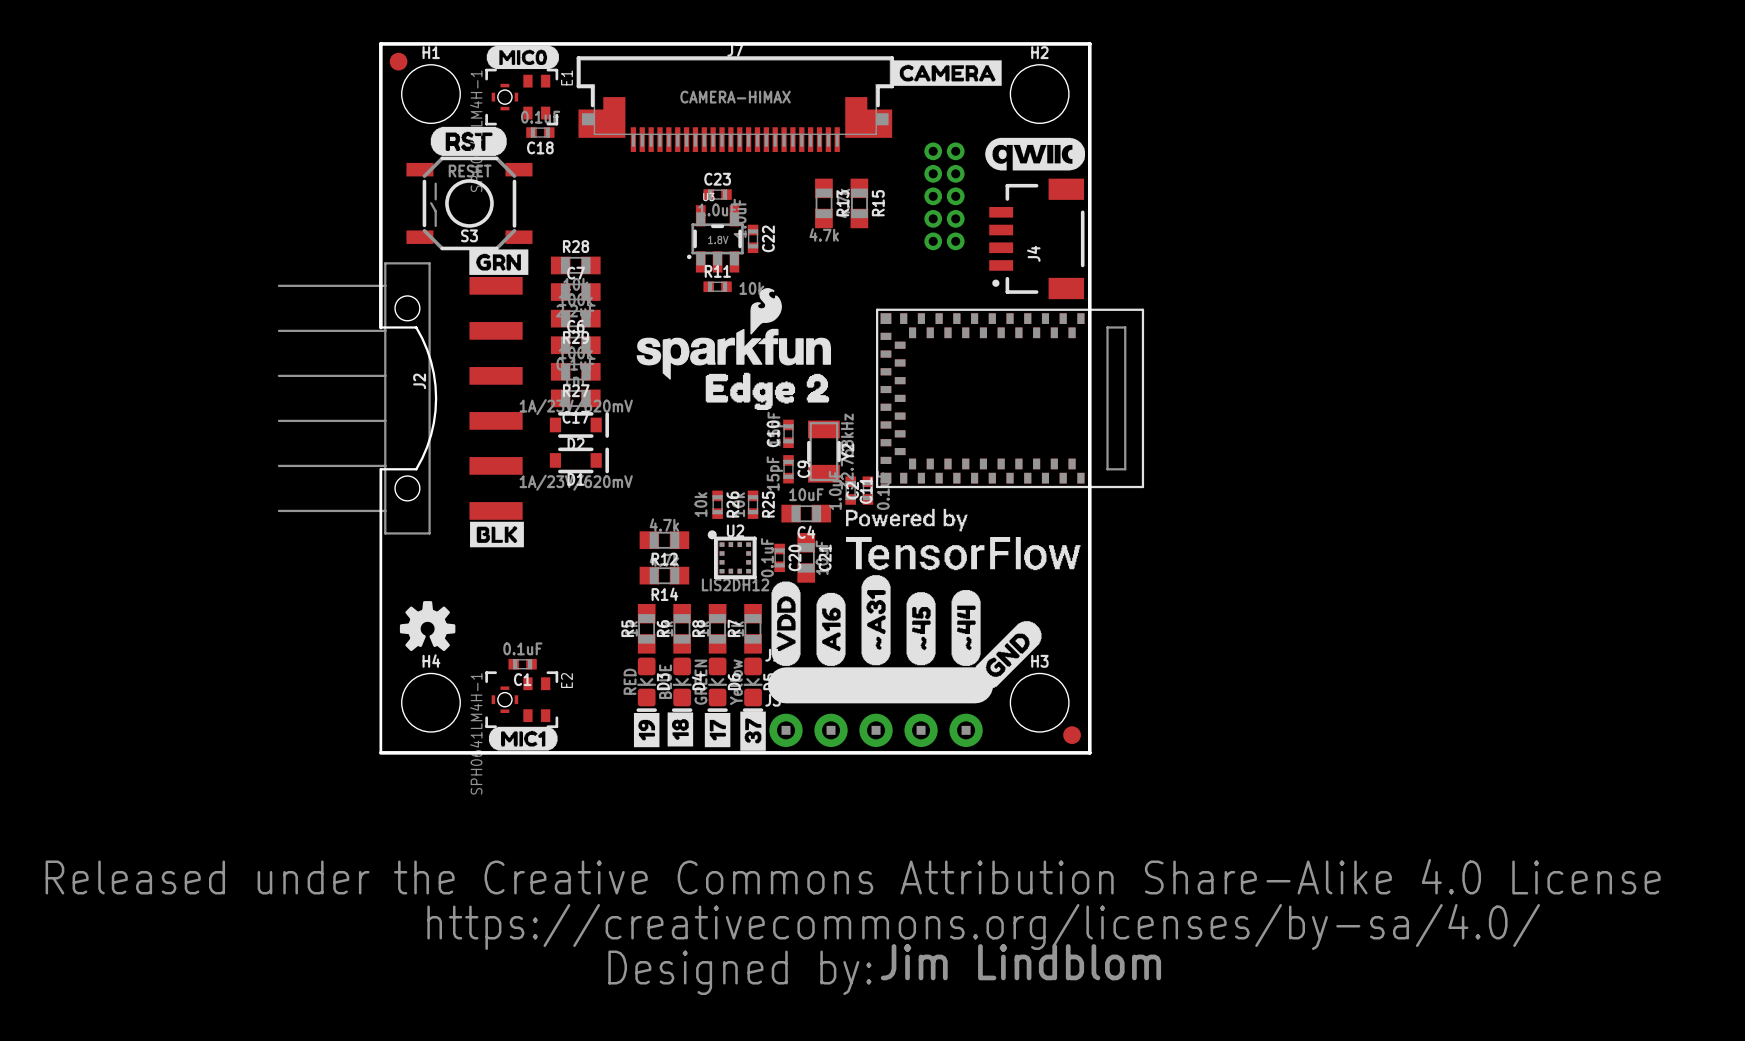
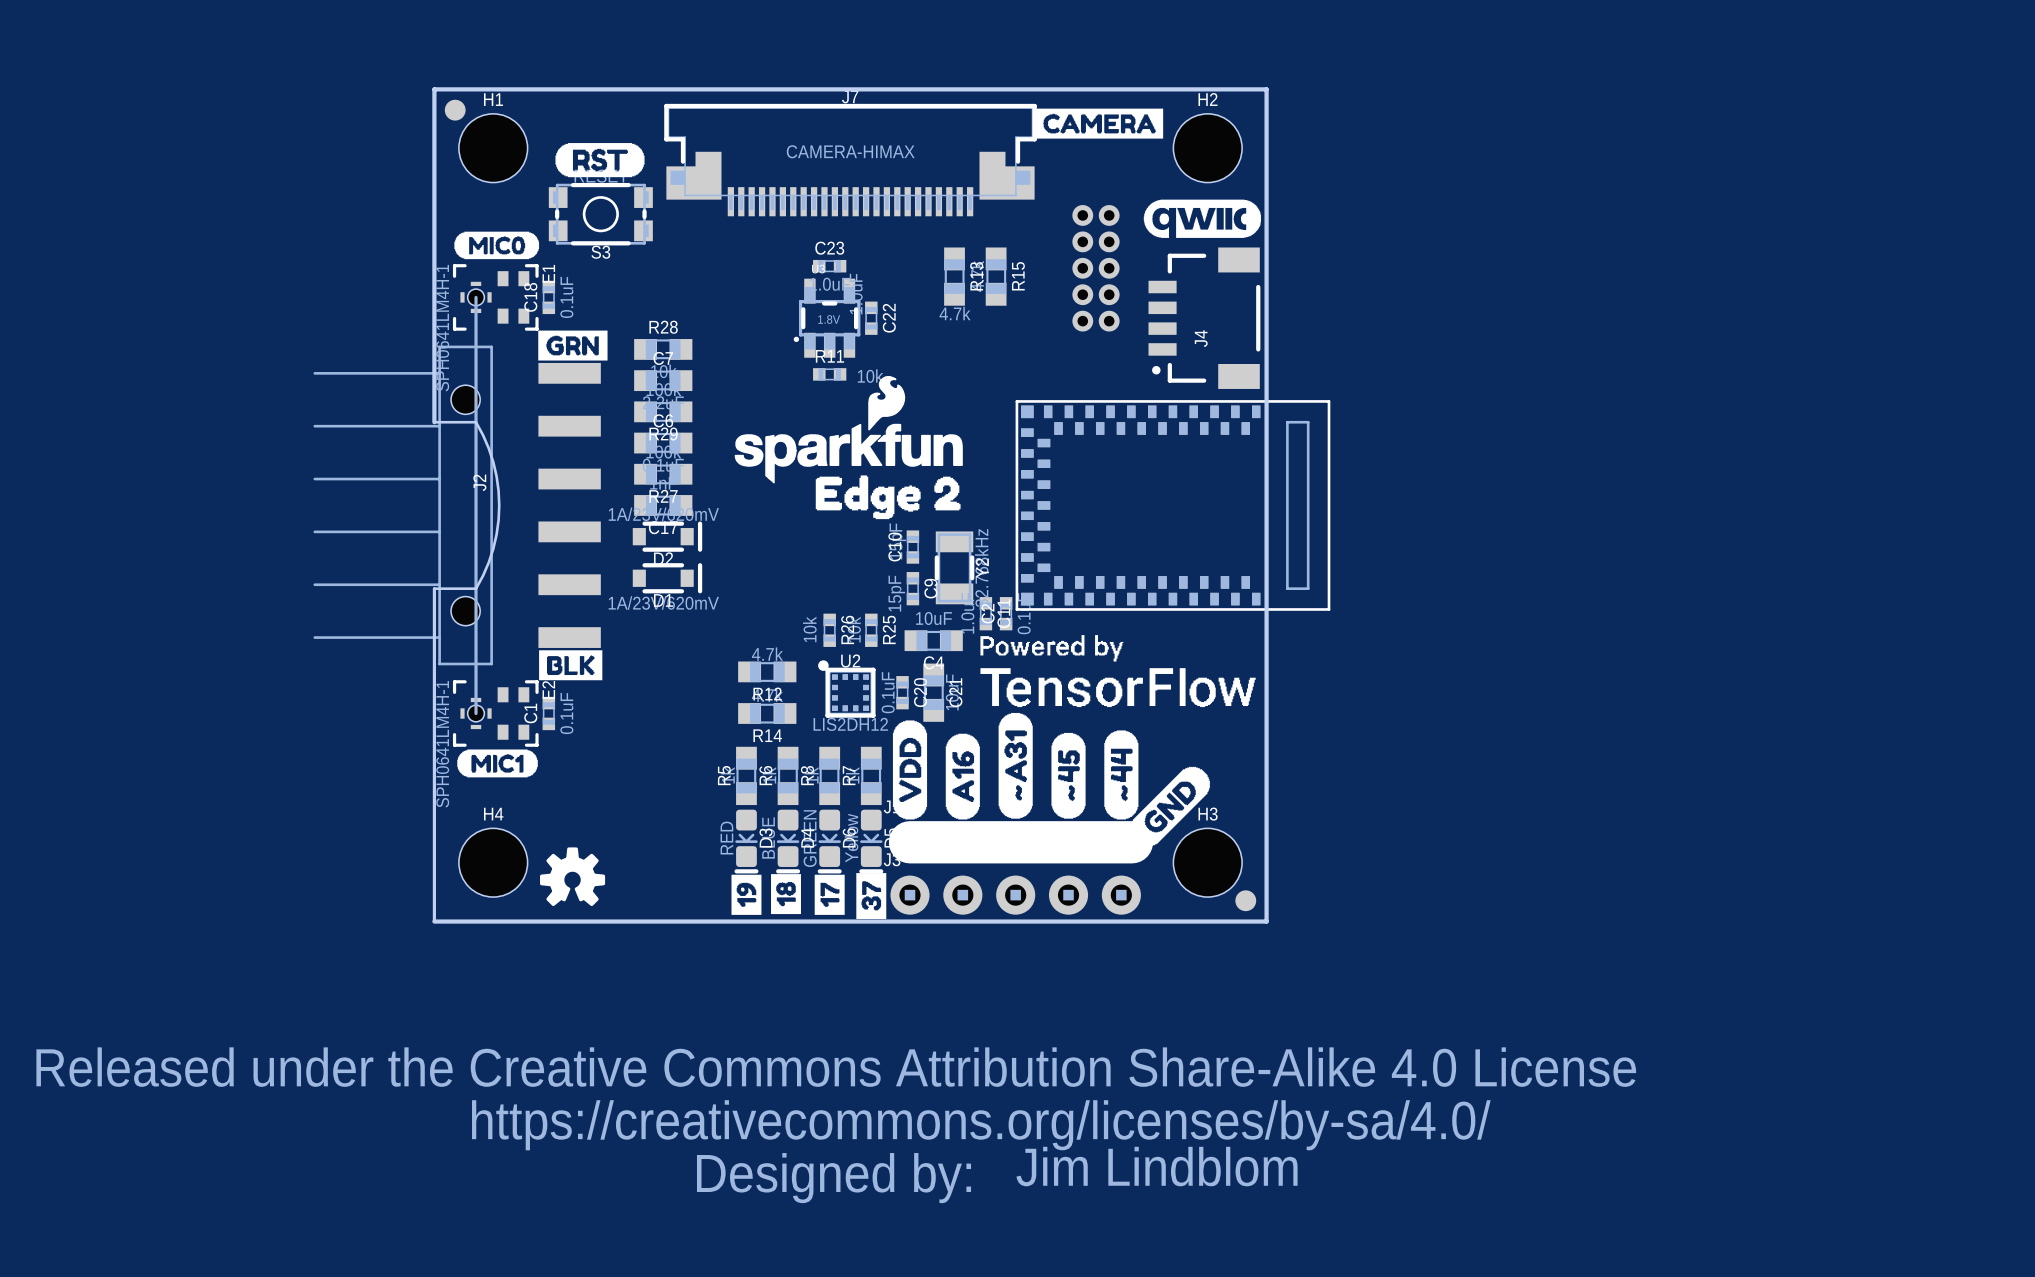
drawing position: (522, 57) -> (496, 245)
E1 position: (521, 97) -> (495, 297)
C18 rotation: 0° (540, 132) -> 90° clockwise (548, 297)
C18 position: (540, 132) -> (548, 297)
drawing position: (468, 141) -> (600, 160)
S3 footprint: [406, 156, 533, 251] -> [548, 182, 653, 246]
line: none -> (476, 297) (476, 713)
drawing position: (427, 626) -> (572, 876)
C1 rotation: 0° (522, 664) -> 90° clockwise (548, 713)
C1 position: (522, 664) -> (548, 713)
E2 position: (521, 699) -> (495, 713)
drawing position: (523, 738) -> (497, 763)

